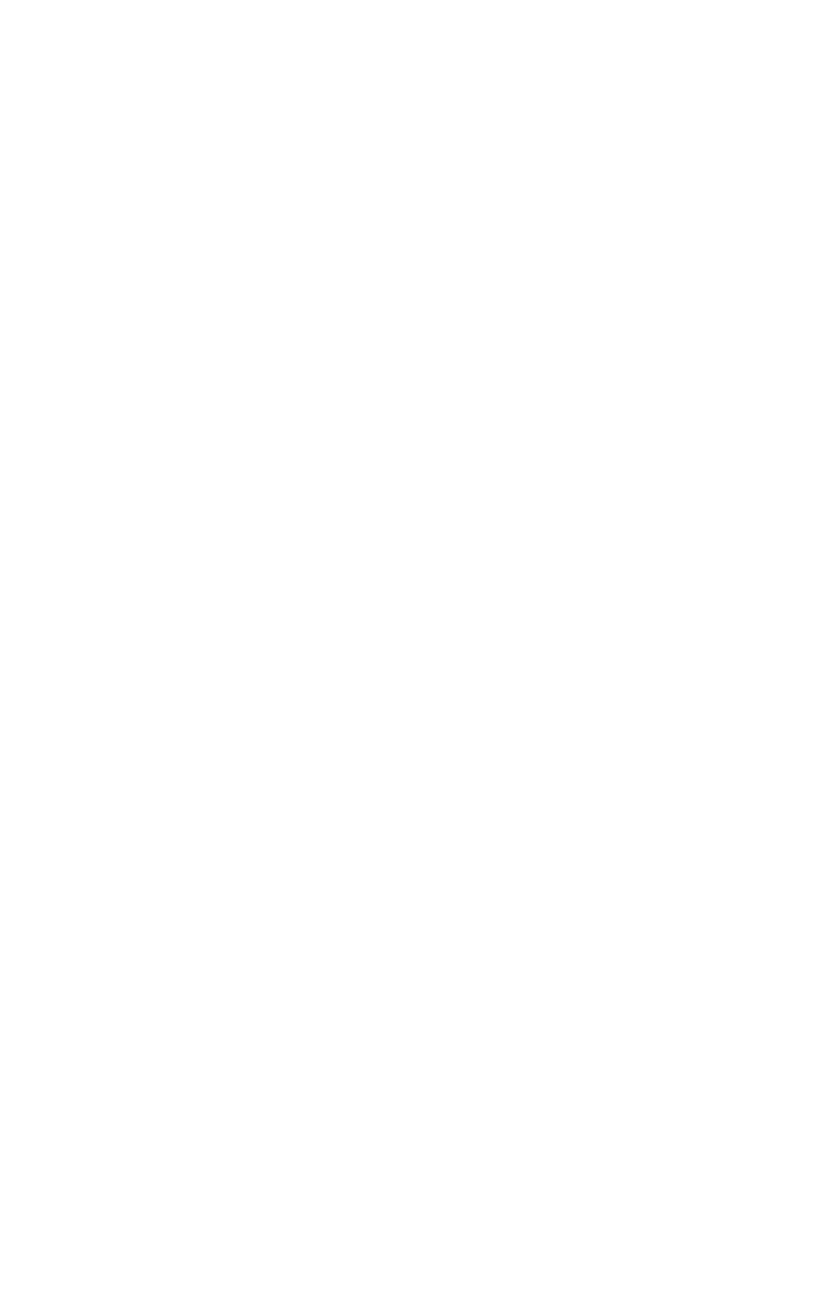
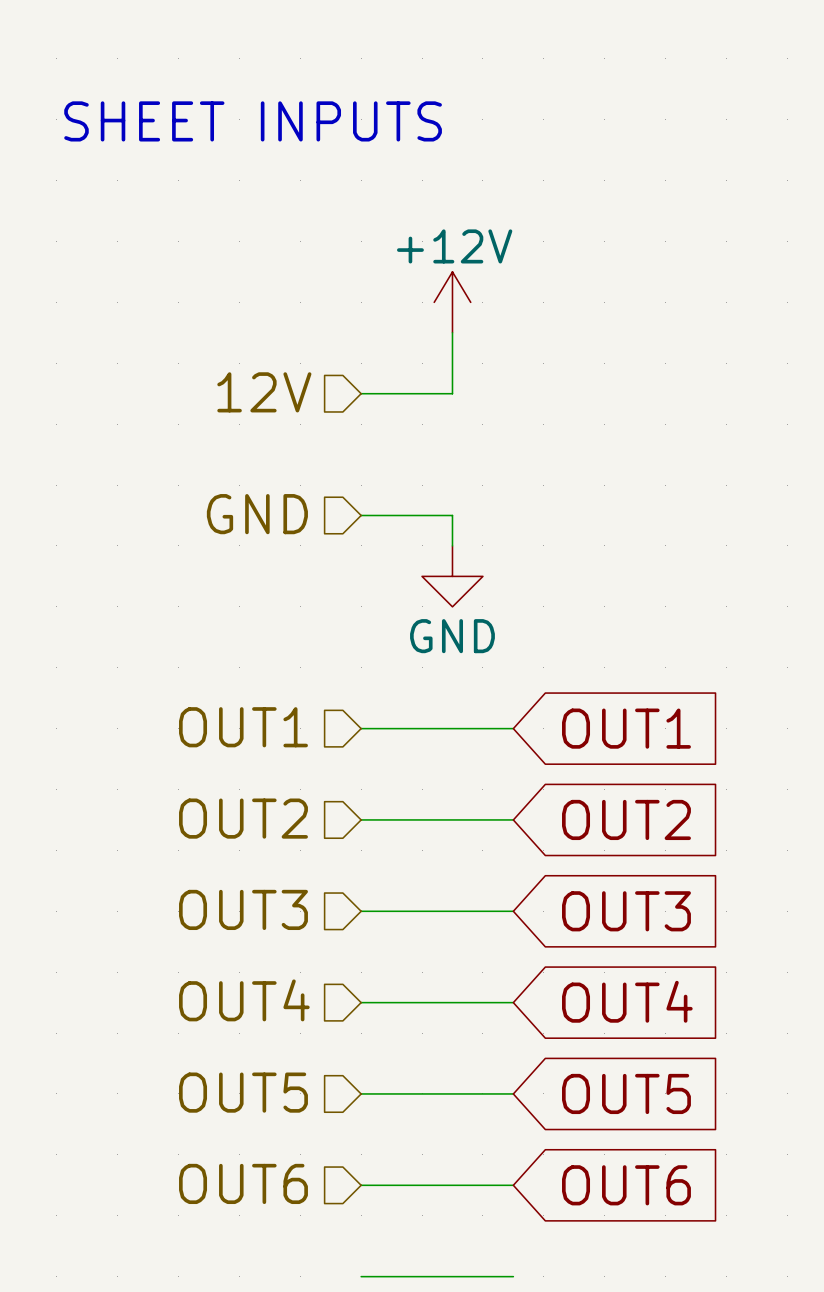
text: none -> SHEET INPUTS (253, 121)
power symbol: none -> +12V (452, 302)
wire: none -> (452, 332) (452, 393) (361, 393)
hierarchical label: none -> 12V (264, 392)
hierarchical label: none -> GND (257, 514)
wire: none -> (361, 515) (452, 515) (452, 545)
power symbol: none -> GND (452, 576)
hierarchical label: none -> OUT1 (243, 727)
wire: none -> (361, 728) (513, 728)
global label: none -> OUT1 (626, 728)
hierarchical label: none -> OUT2 (243, 818)
wire: none -> (361, 819) (513, 819)
global label: none -> OUT2 (626, 819)
hierarchical label: none -> OUT3 (243, 909)
wire: none -> (361, 911) (513, 911)
global label: none -> OUT3 (626, 911)
hierarchical label: none -> OUT4 (244, 1000)
global label: none -> OUT4 (627, 1001)
wire: none -> (361, 1002) (513, 1002)
hierarchical label: none -> OUT5 (243, 1092)
wire: none -> (361, 1093) (513, 1093)
global label: none -> OUT5 (626, 1093)
hierarchical label: none -> OUT6 (243, 1183)
wire: none -> (361, 1185) (513, 1185)
global label: none -> OUT6 (626, 1185)
wire: none -> (361, 1276) (513, 1276)

